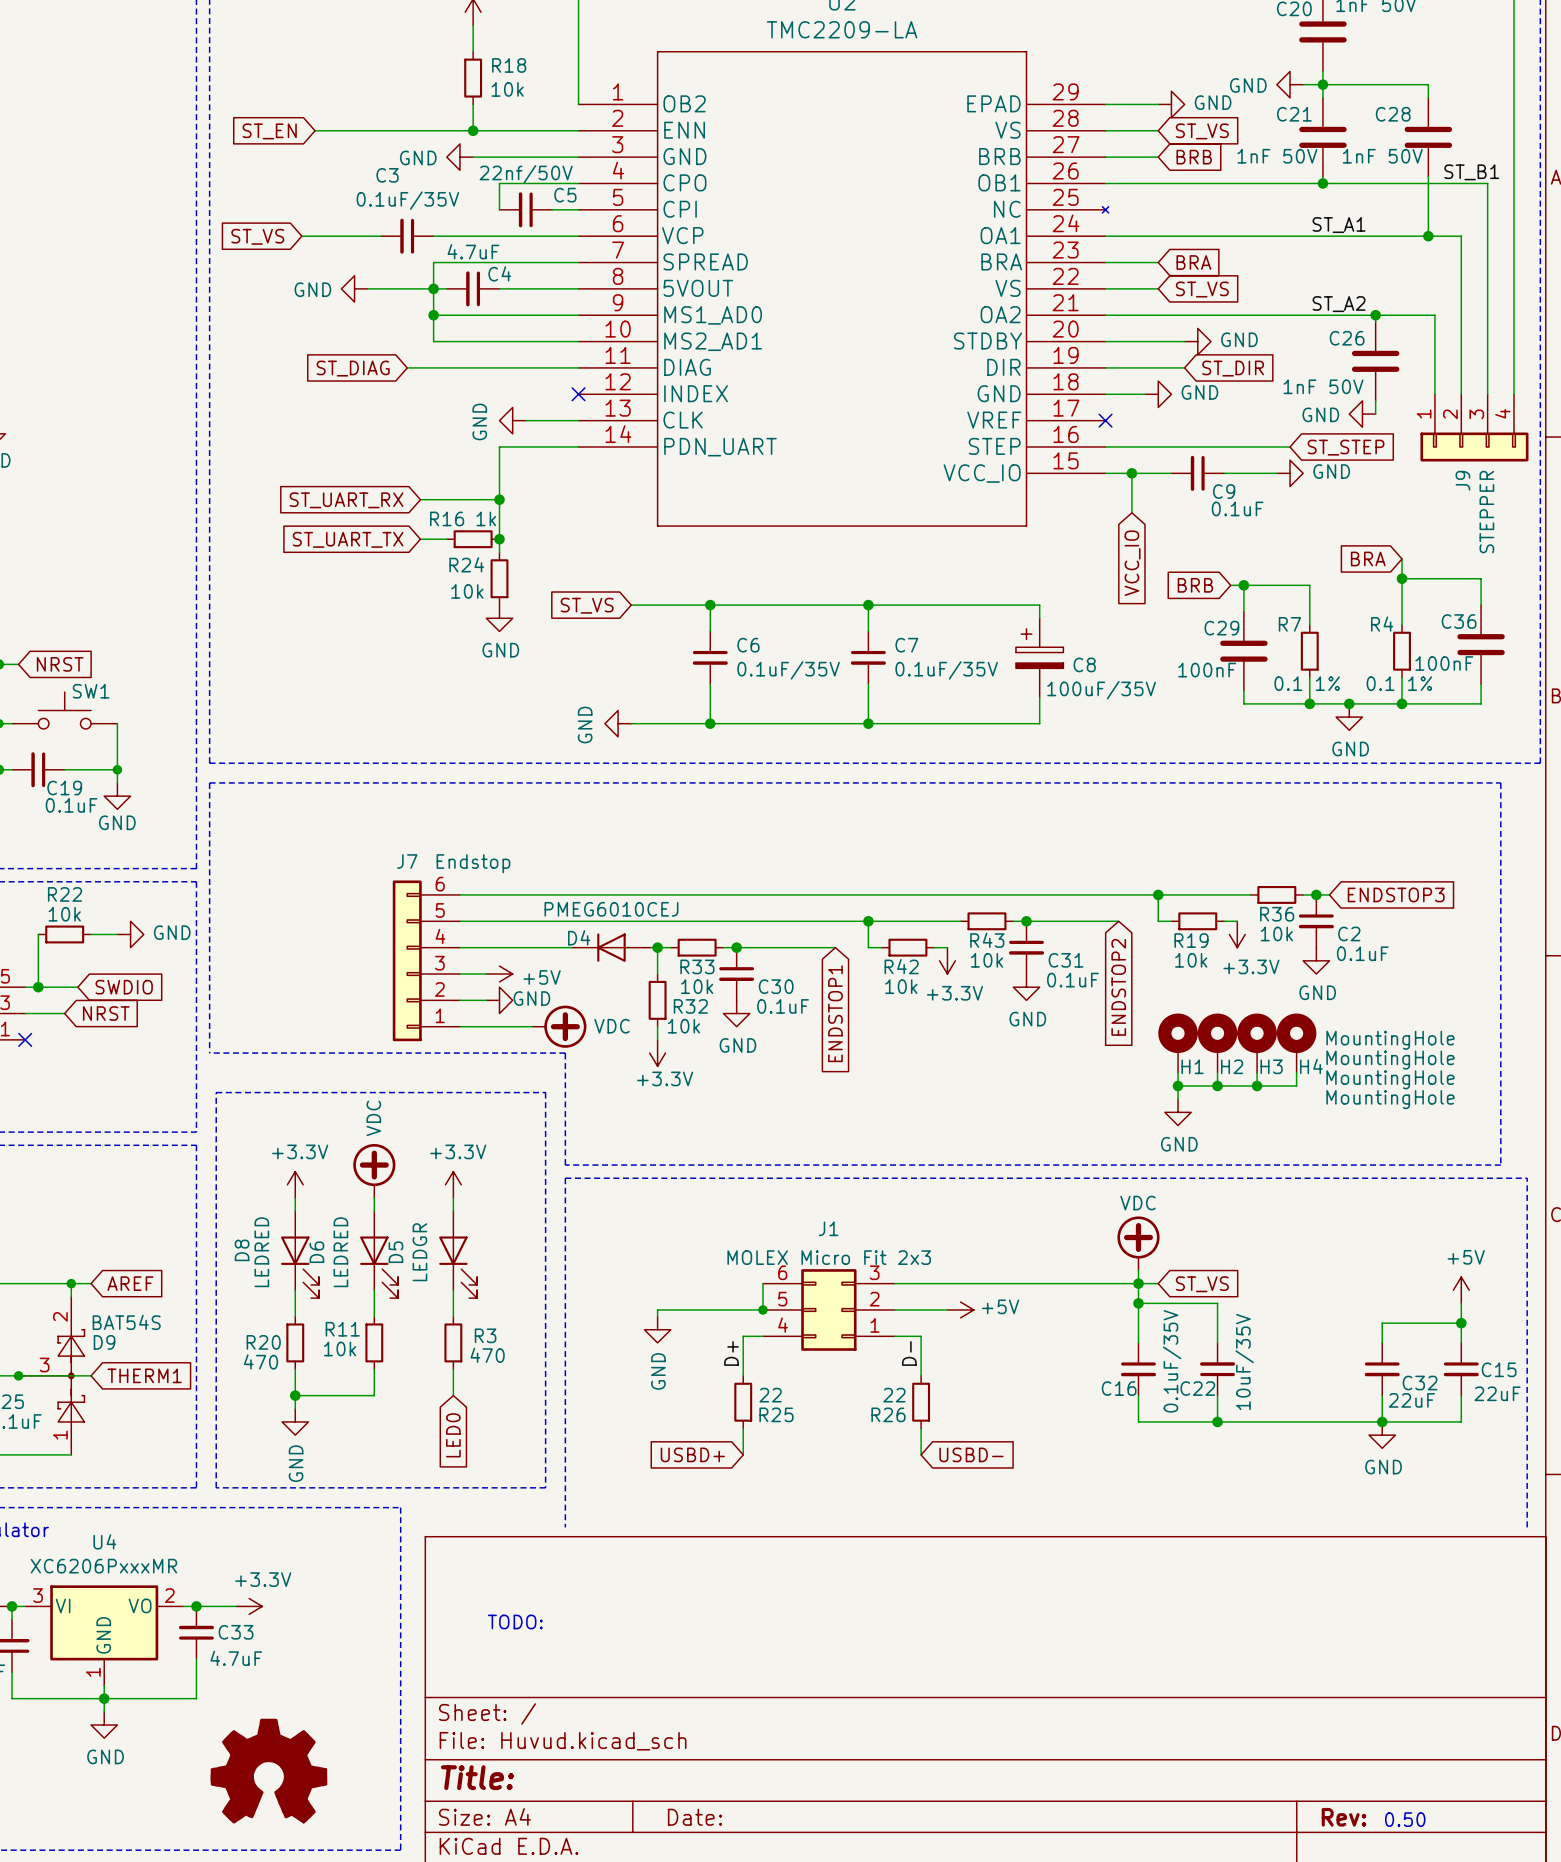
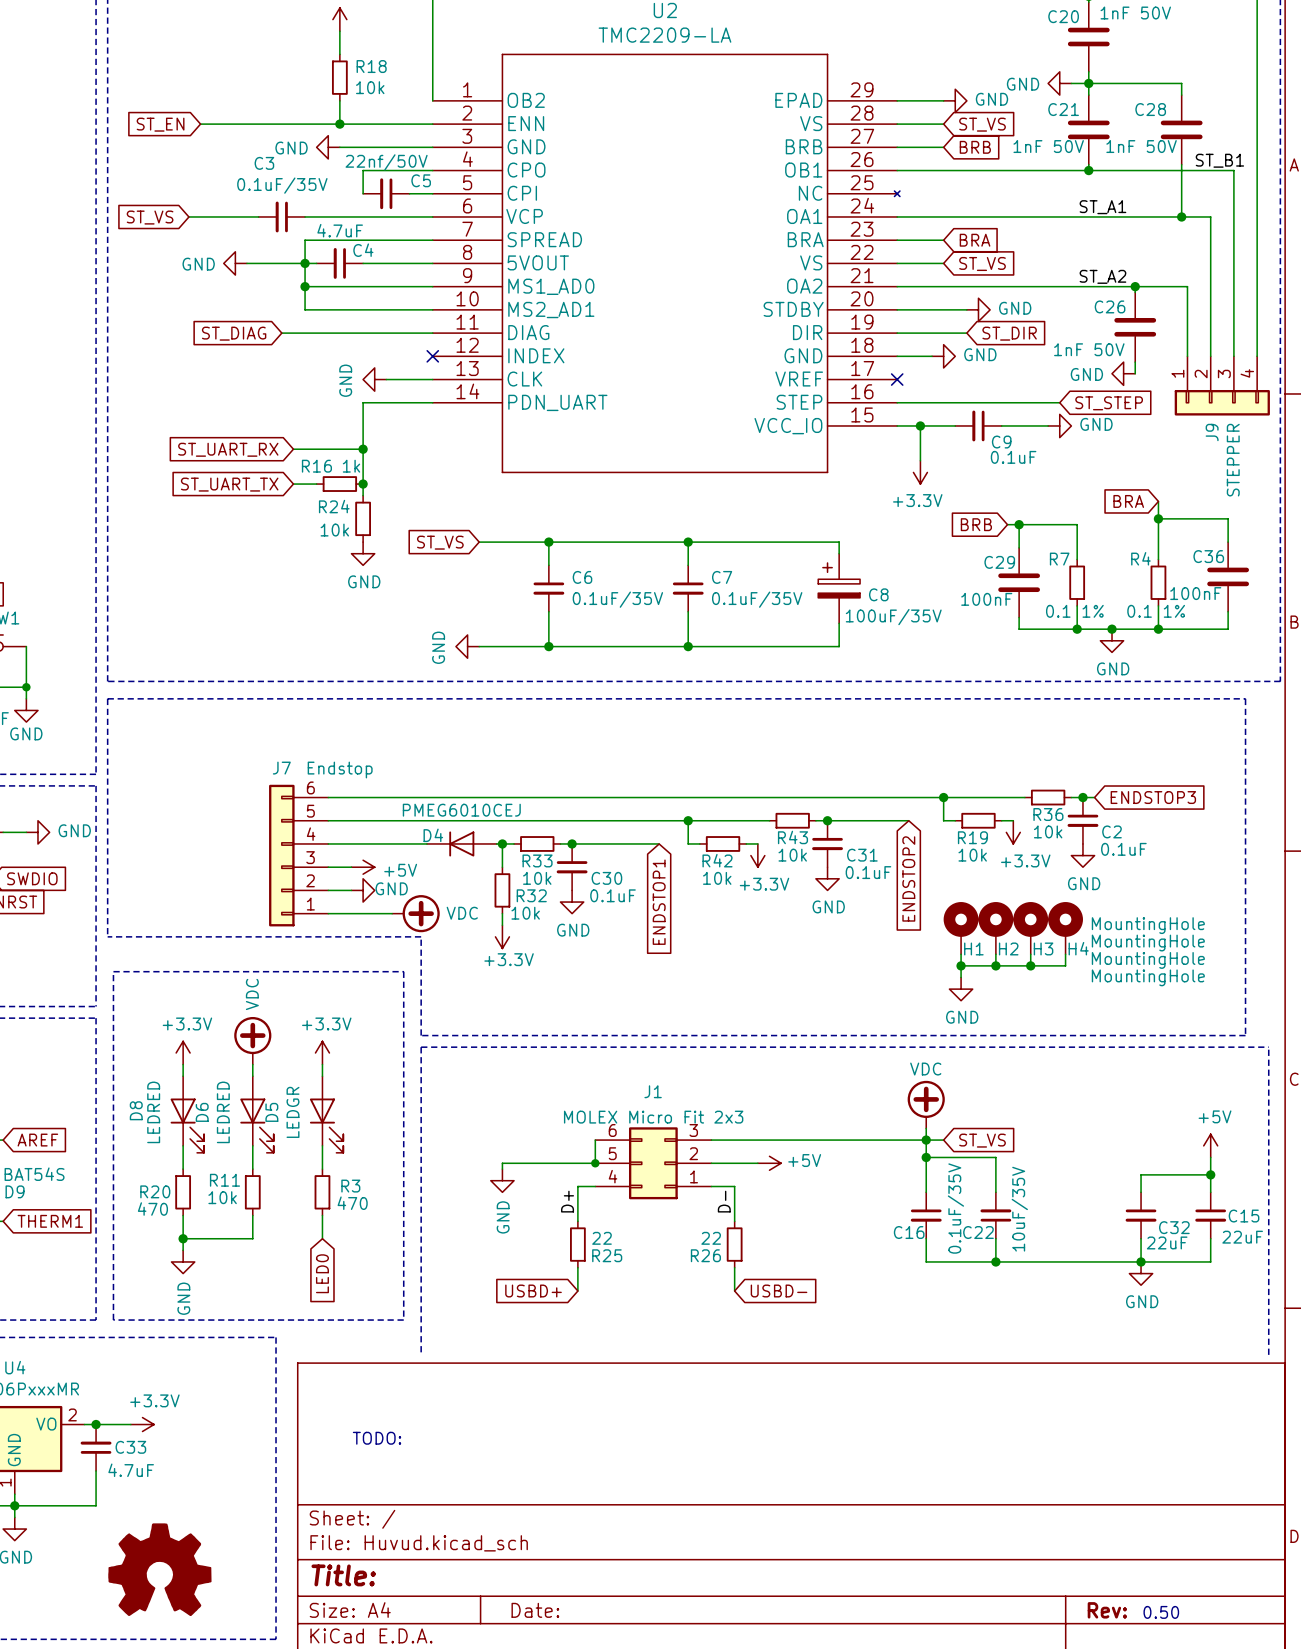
power symbol: none -> +3.3V (920, 472)
global label: VCC_IO (1132, 563) -> none

